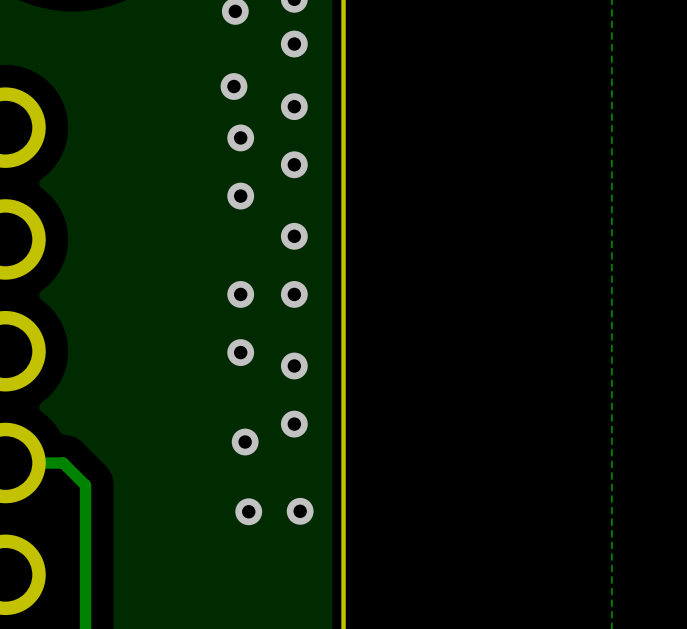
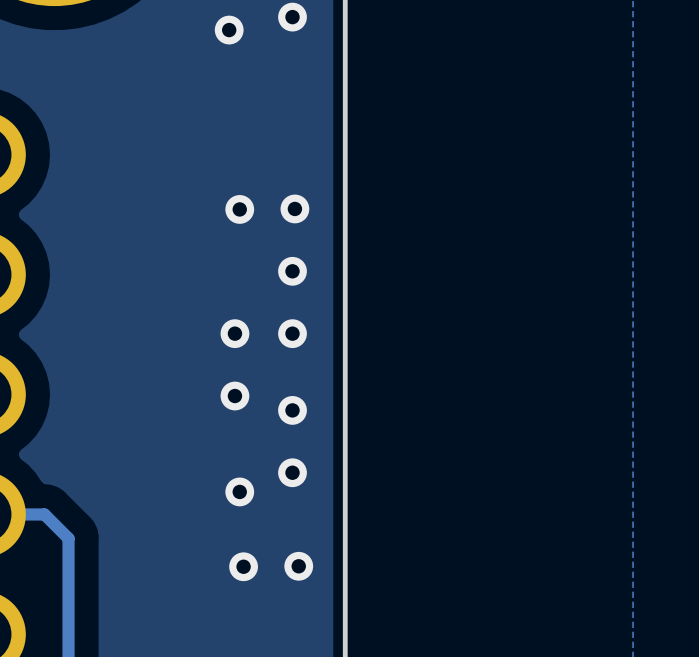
via: (294, 44) -> none
via: (233, 86) -> none
via: (294, 106) -> none
via: (240, 137) -> none
via position: (294, 164) -> (294, 208)
via position: (240, 196) -> (239, 209)

